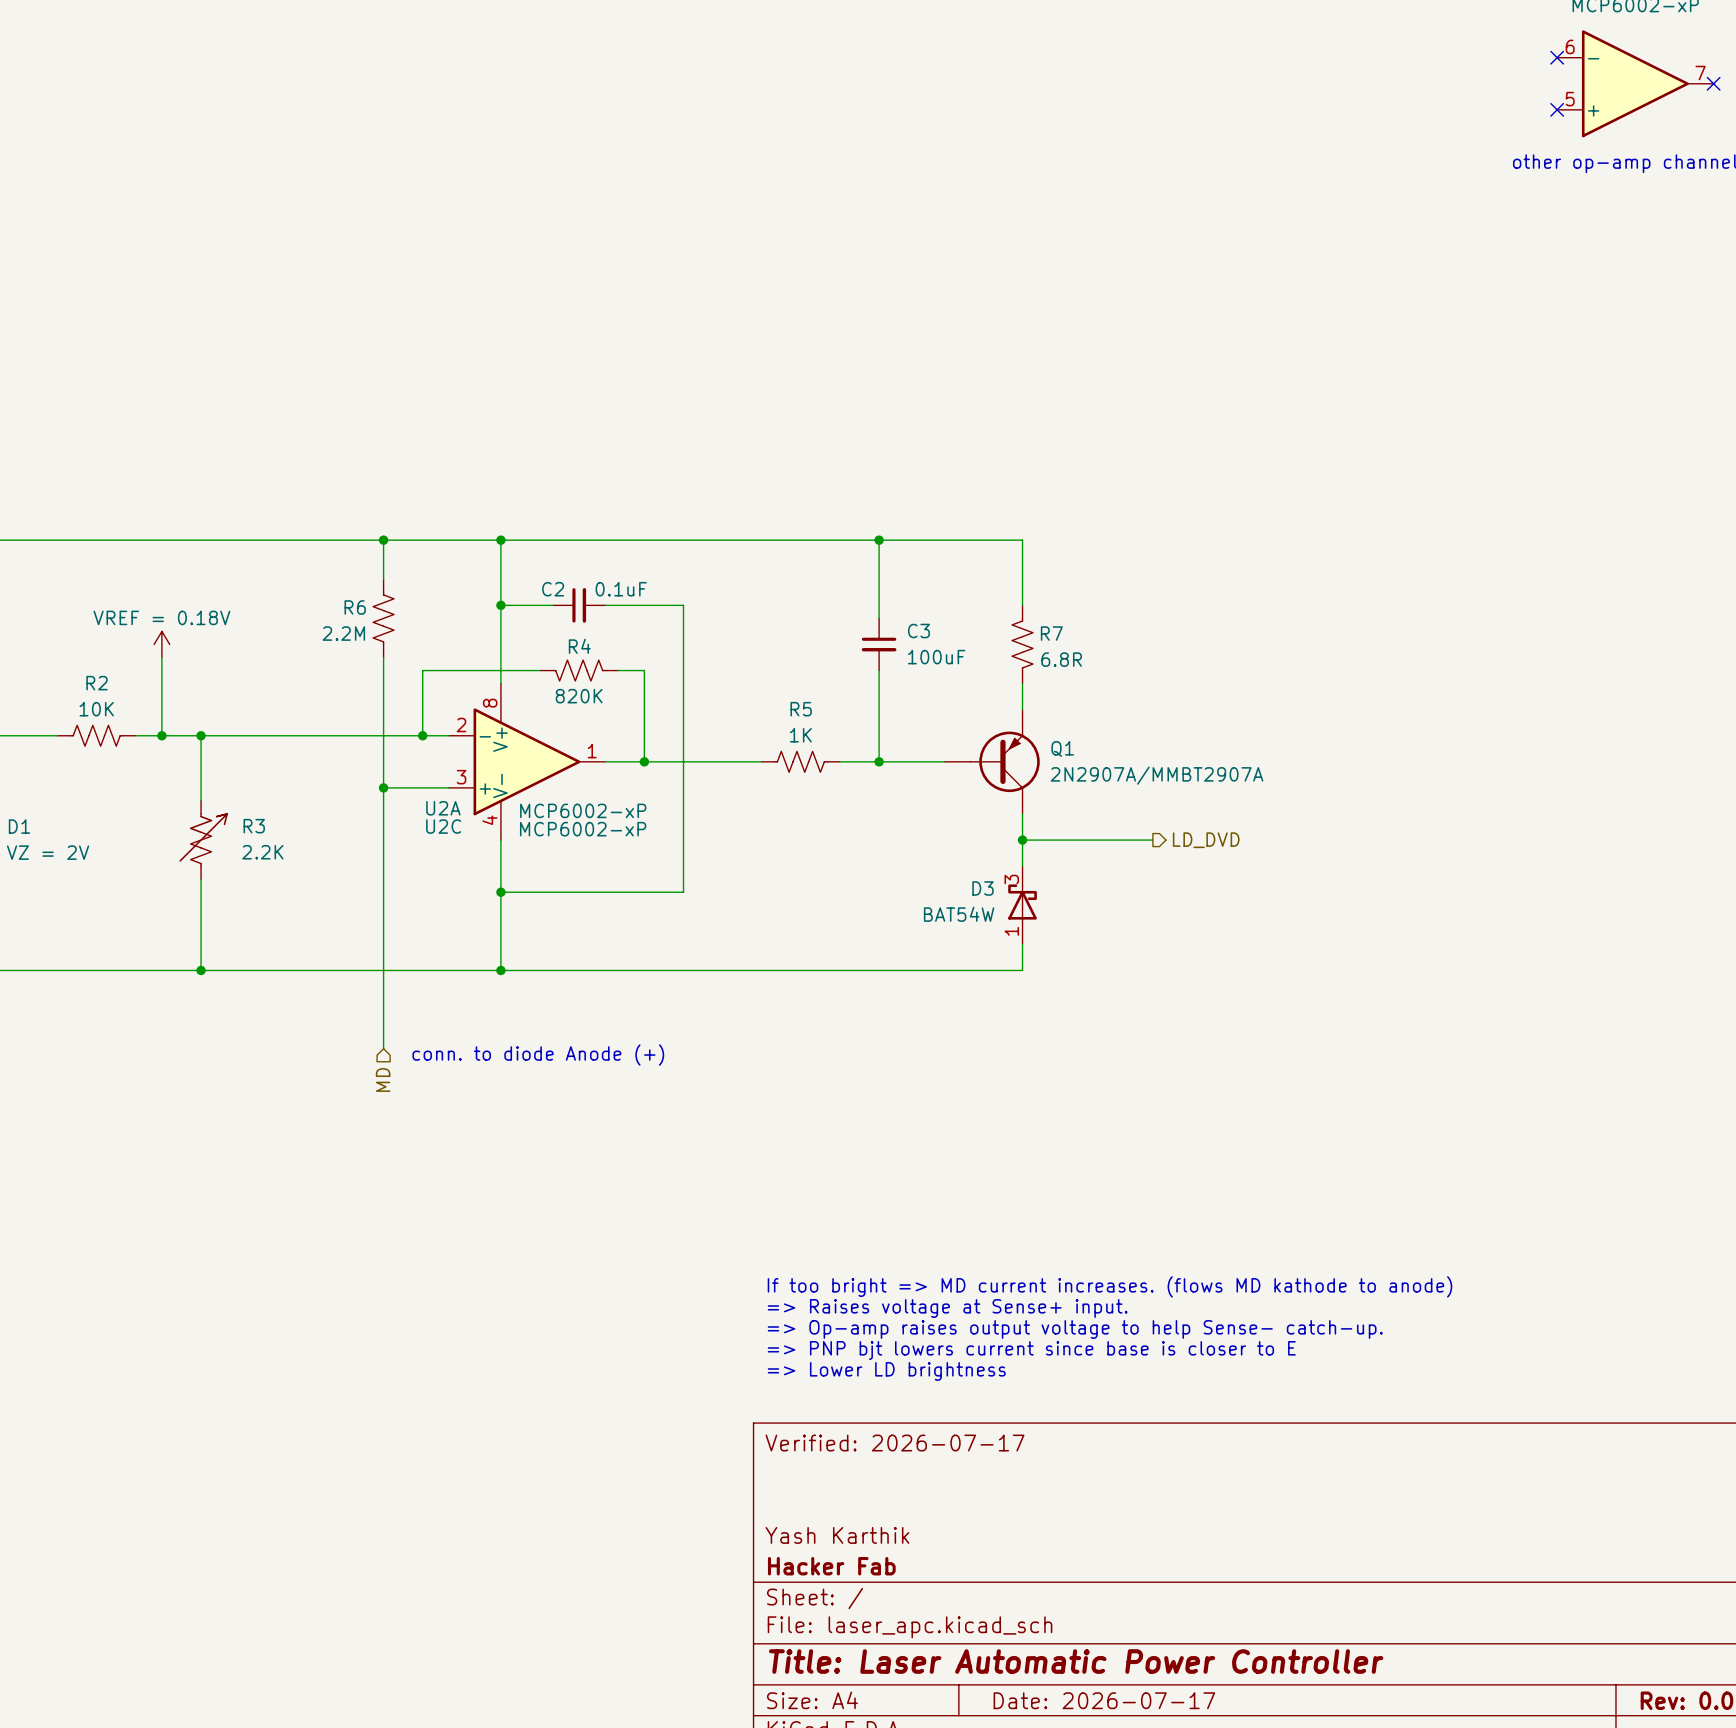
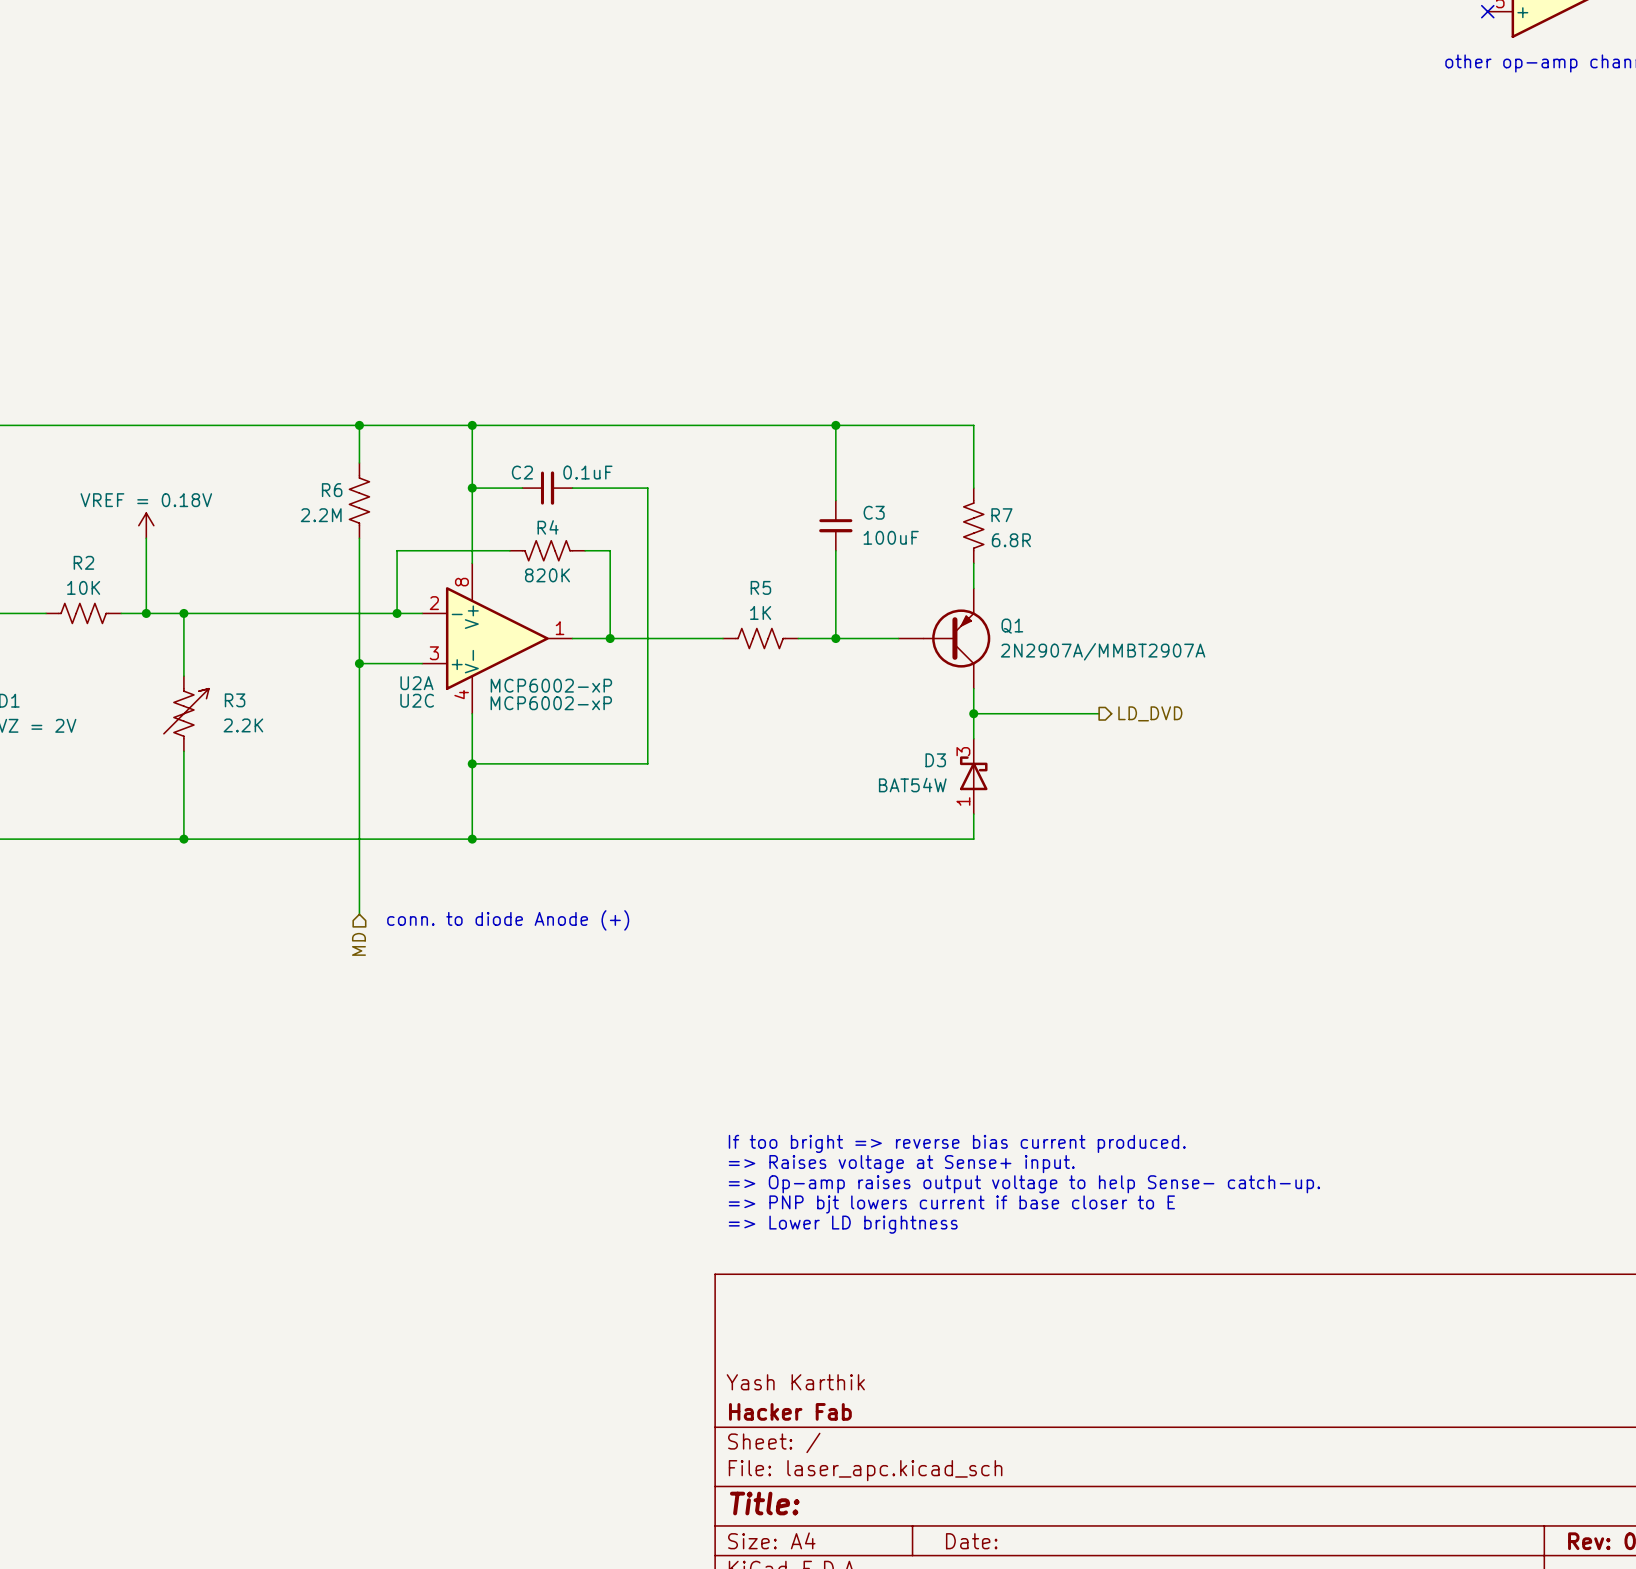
text: If too bright => MD current increases. (flows MD kathode to anode) (1109, 1286) -> If too bright => reverse bias current produced. (957, 1143)
text: => PNP bjt lowers current since base is closer to E (1031, 1350) -> => PNP bjt lowers current if base closer to E (951, 1204)
title block: Verified: 2026-07-17 (895, 1443) -> none
title block: Title: Laser Automatic Power Controller (1076, 1661) -> Title: (764, 1503)
title block: Date: 2026-07-17 (1104, 1700) -> Date: (971, 1541)

